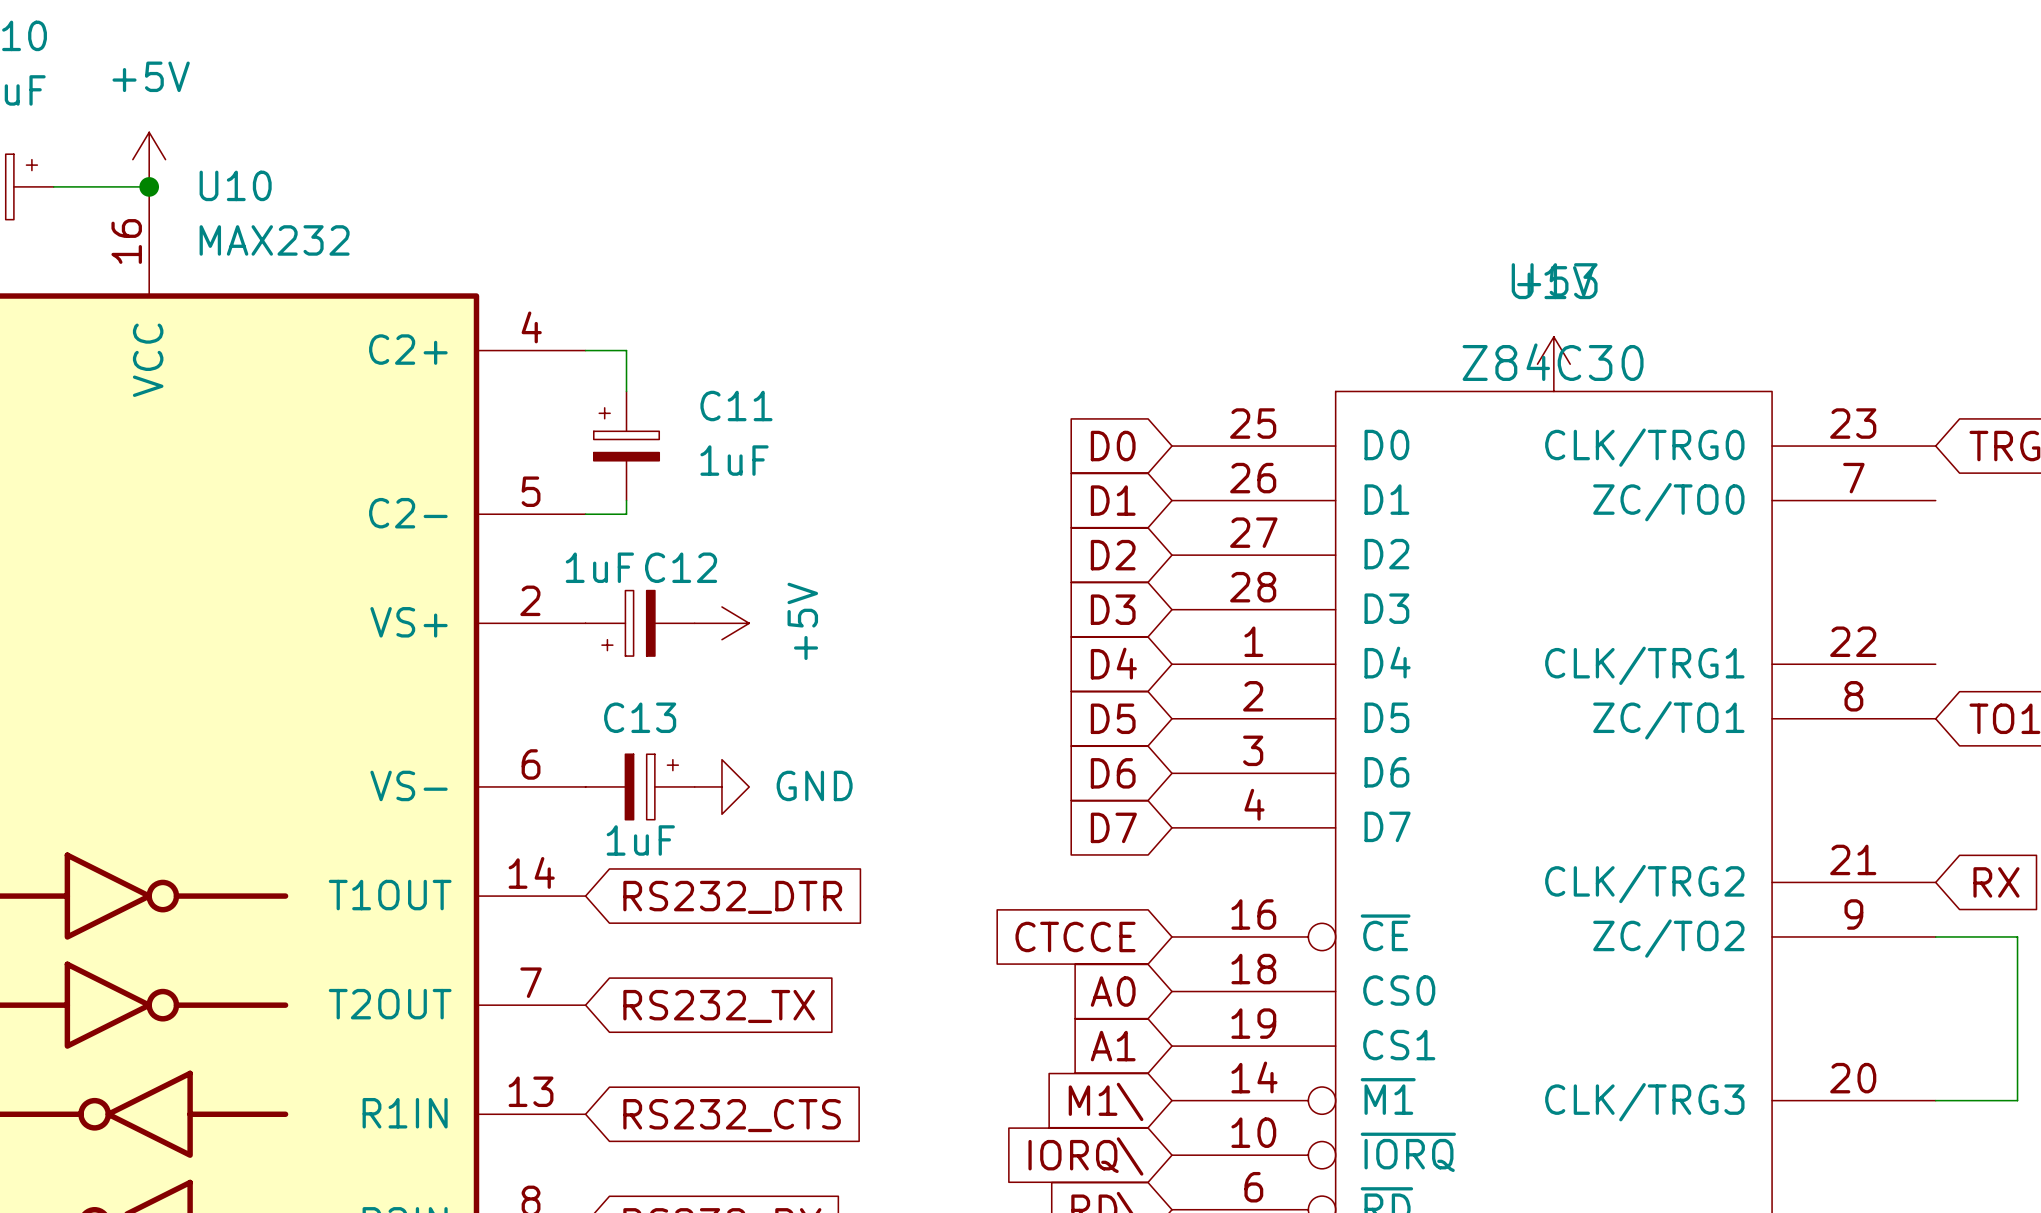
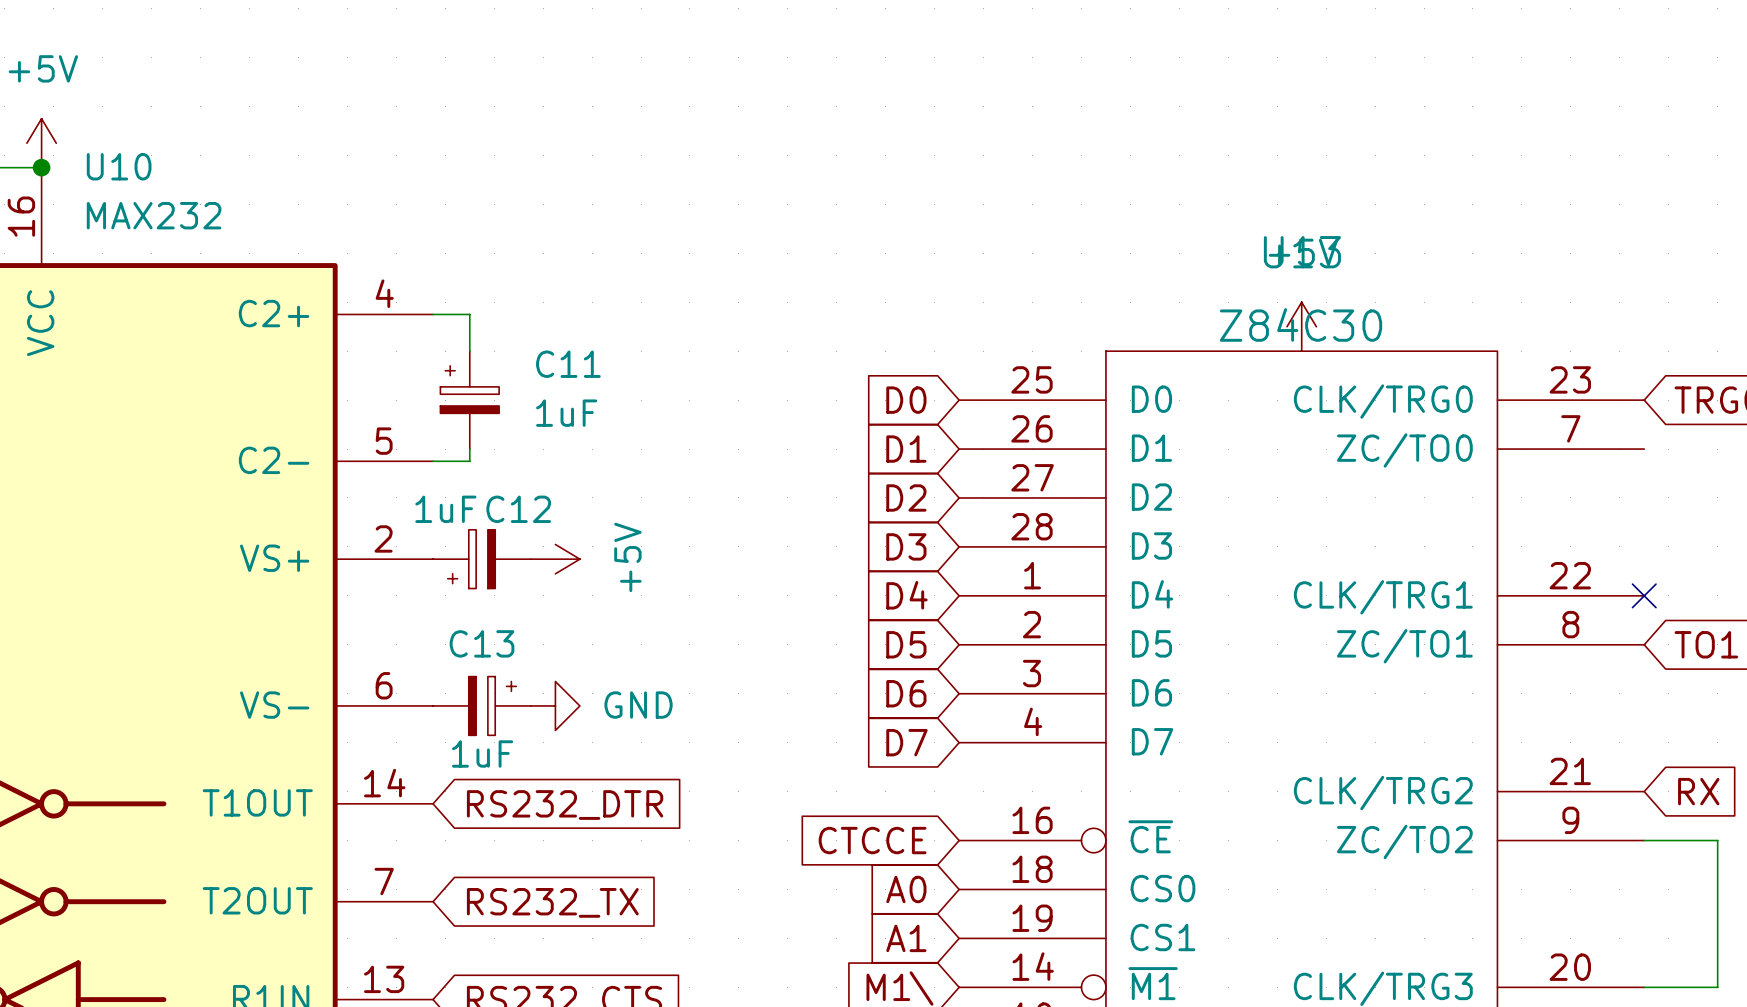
no-connect mark: none -> (1644, 595)

